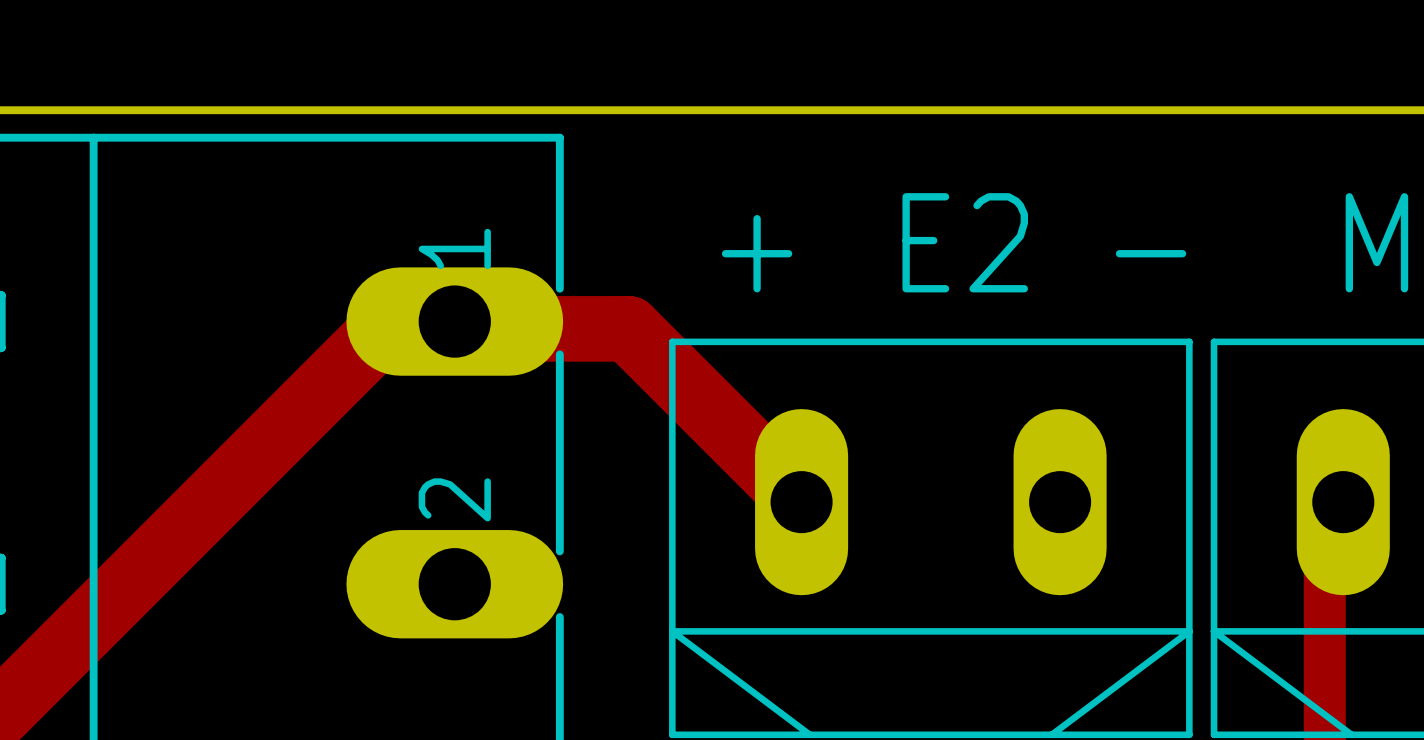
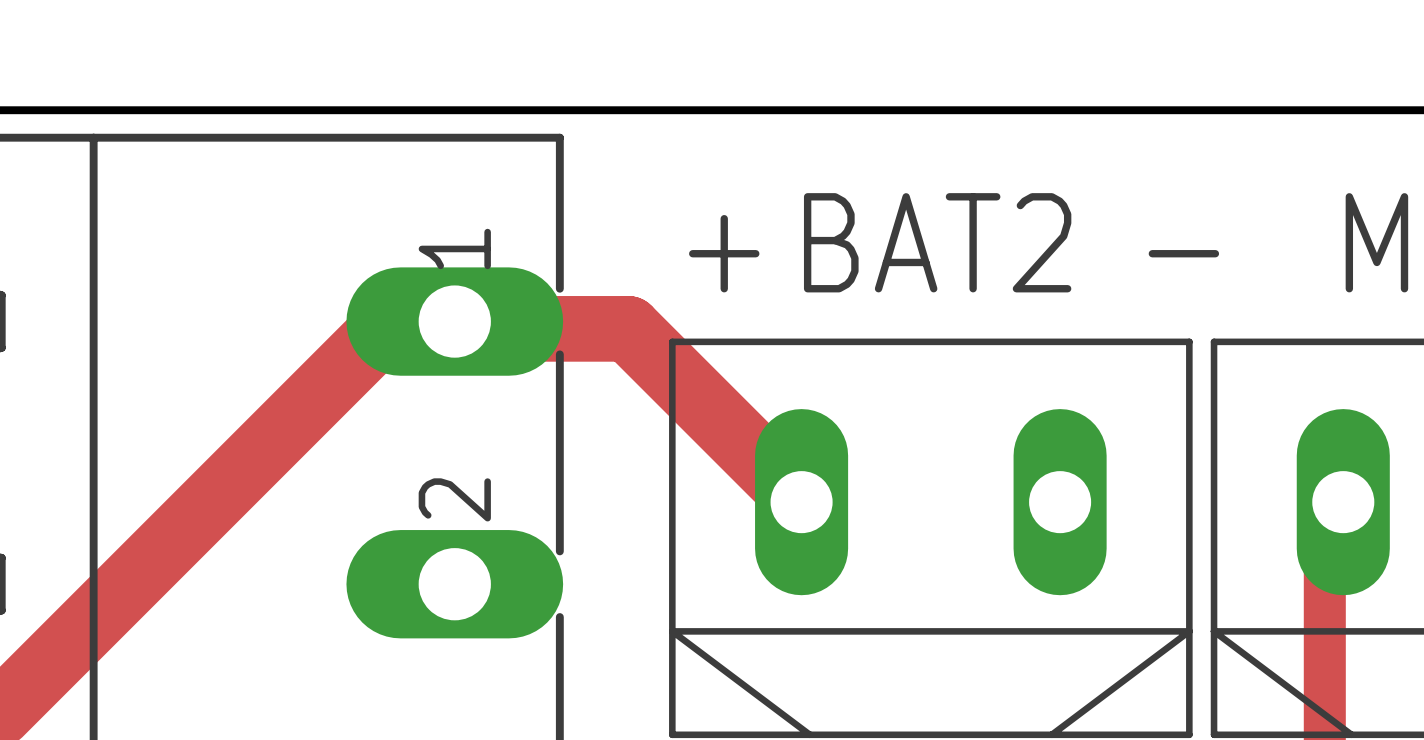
text: none -> BAT2 (937, 242)
text: E2 (965, 242) -> none
text position: + (757, 253) -> + (724, 253)
text position: - (1151, 253) -> - (1183, 253)

